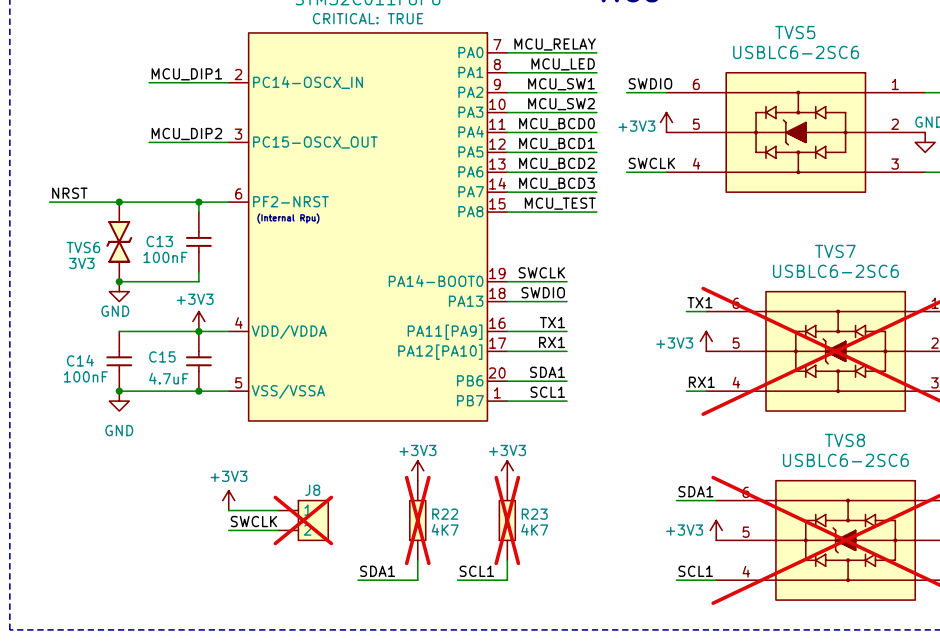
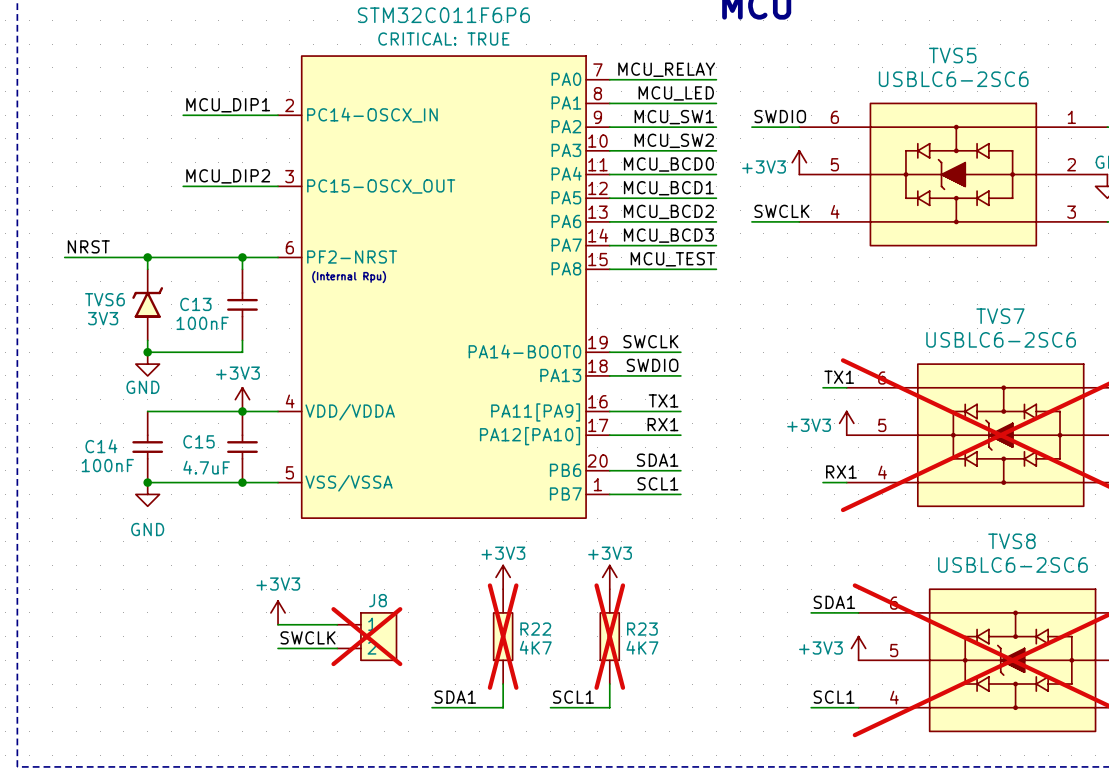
TVS6 symbol: [106, 202, 133, 282] -> [132, 269, 164, 341]

